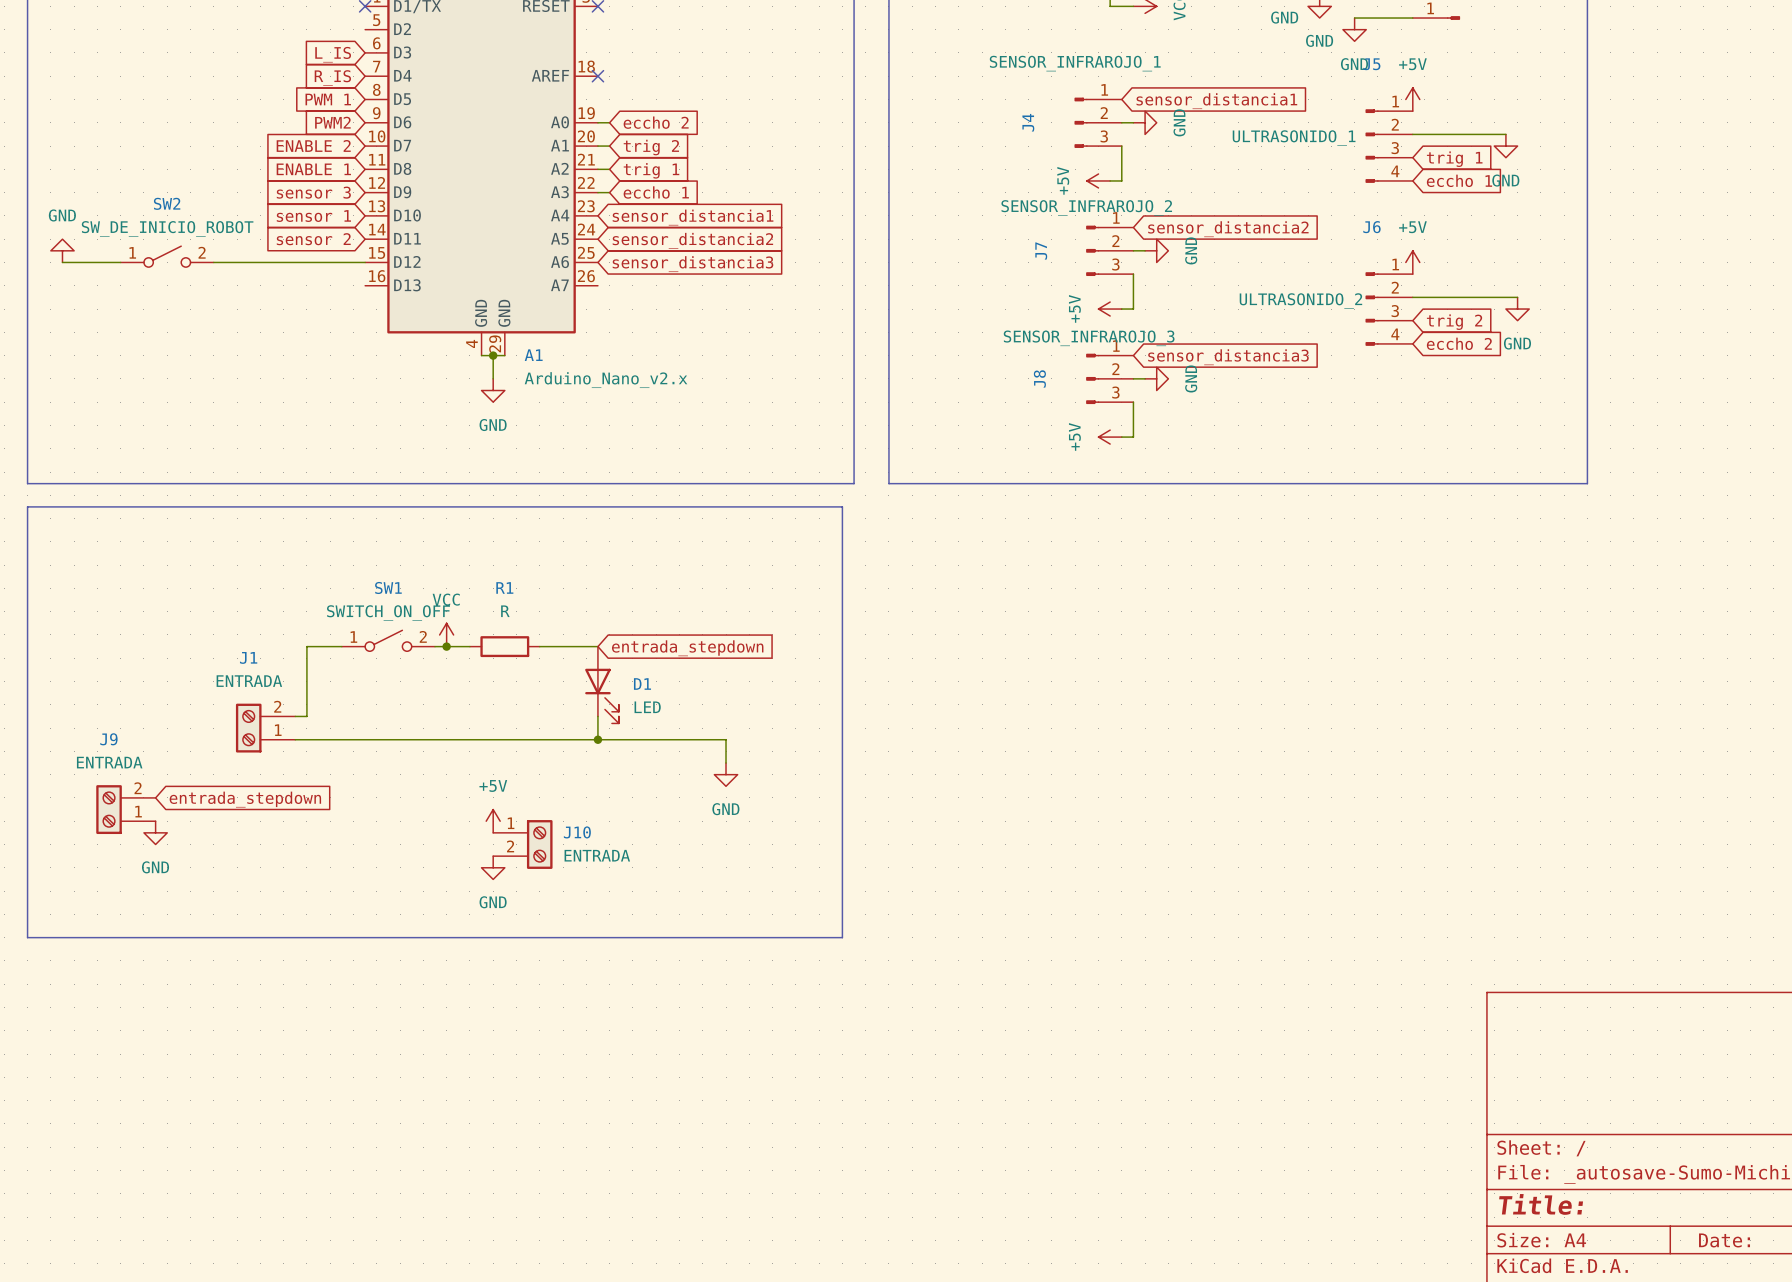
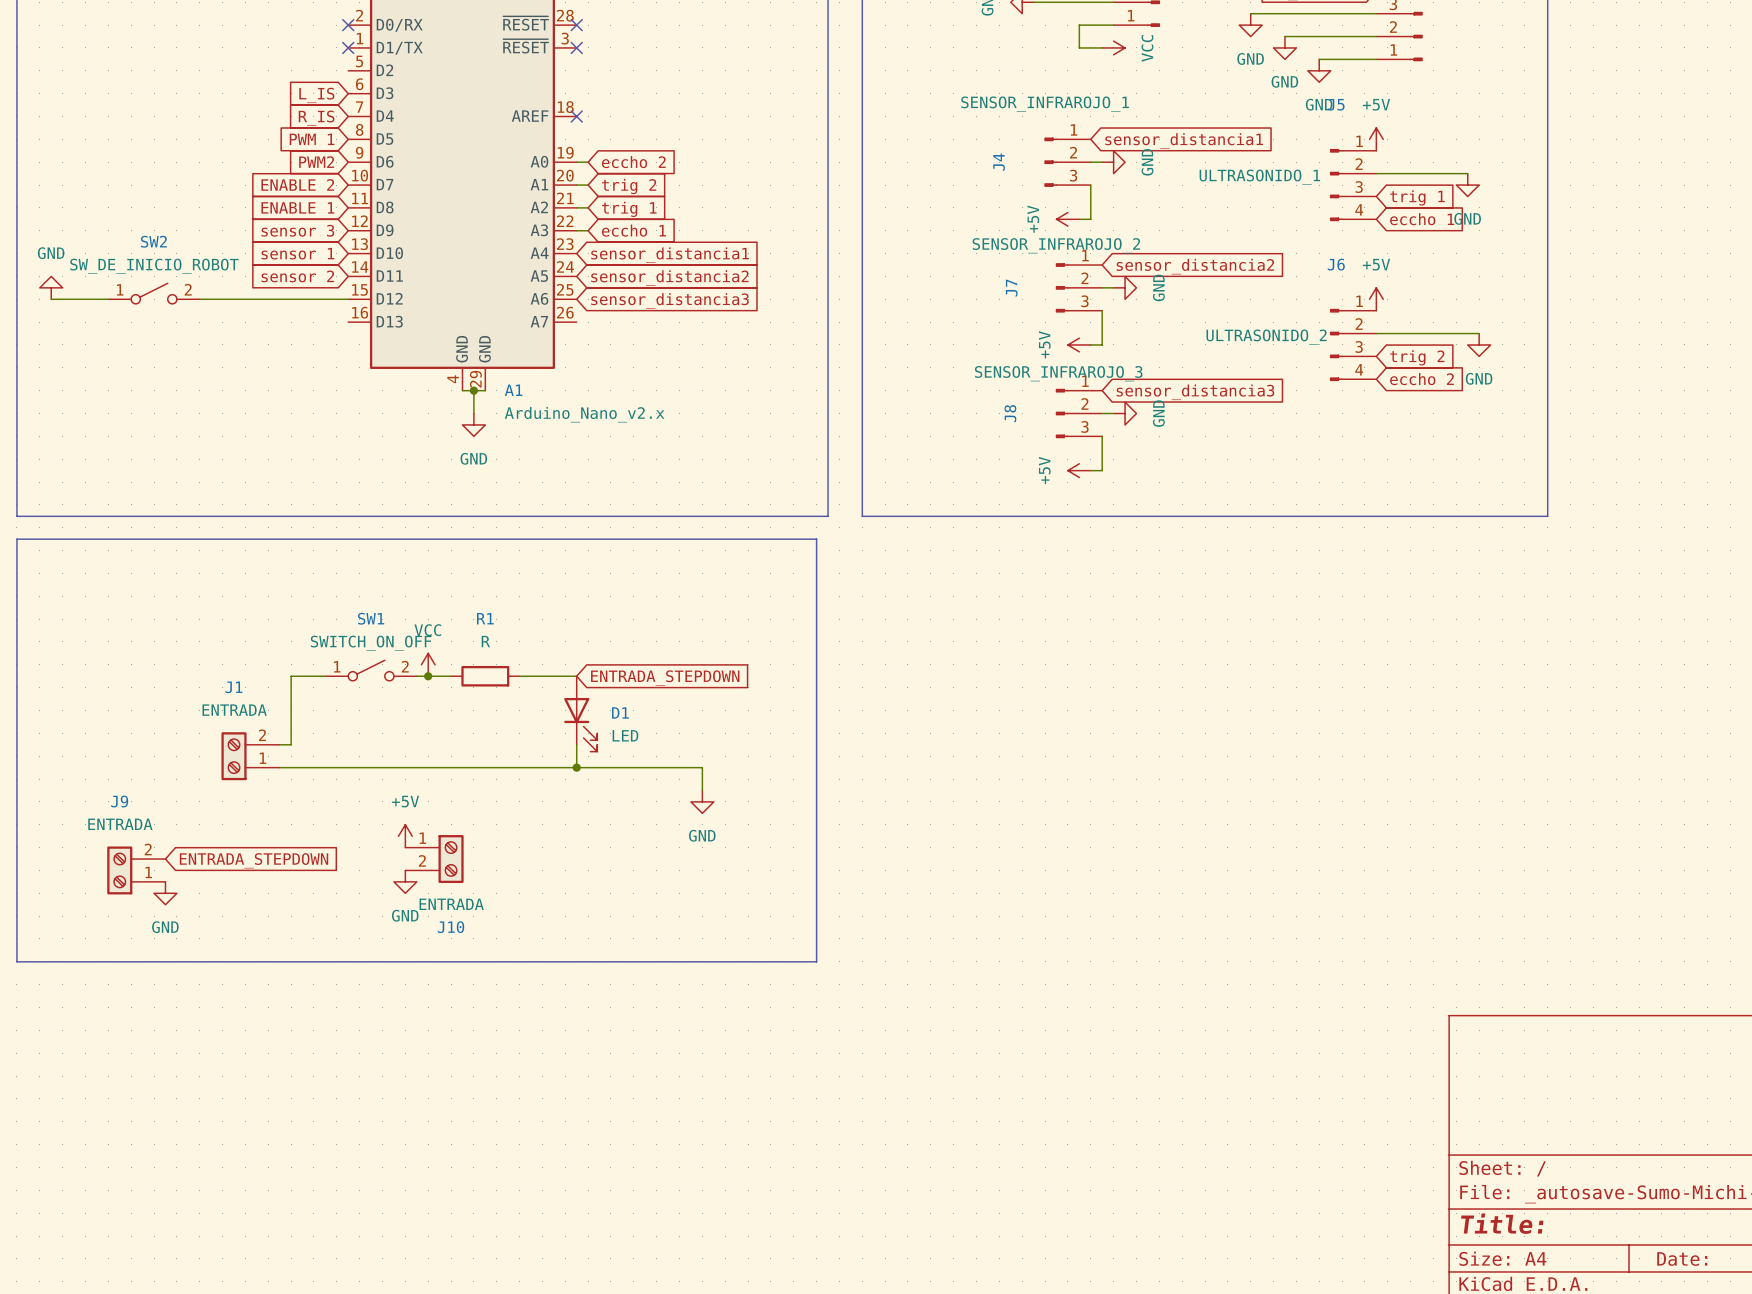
global label: entrada_stepdown (687, 648) -> ENTRADA_STEPDOWN (665, 678)
global label: entrada_stepdown (245, 799) -> none
J9 position: (125, 809) -> (136, 870)
power symbol position: +5V (493, 821) -> +5V (405, 836)
power symbol position: GND (155, 832) -> GND (165, 893)
J10 name position: J10 (577, 832) -> J10 (450, 927)
global label: none -> ENTRADA_STEPDOWN (254, 860)
J10 position: (522, 844) -> (434, 859)
J10 value position: ENTRADA (597, 855) -> ENTRADA (451, 904)
power symbol position: GND (493, 867) -> GND (405, 881)

